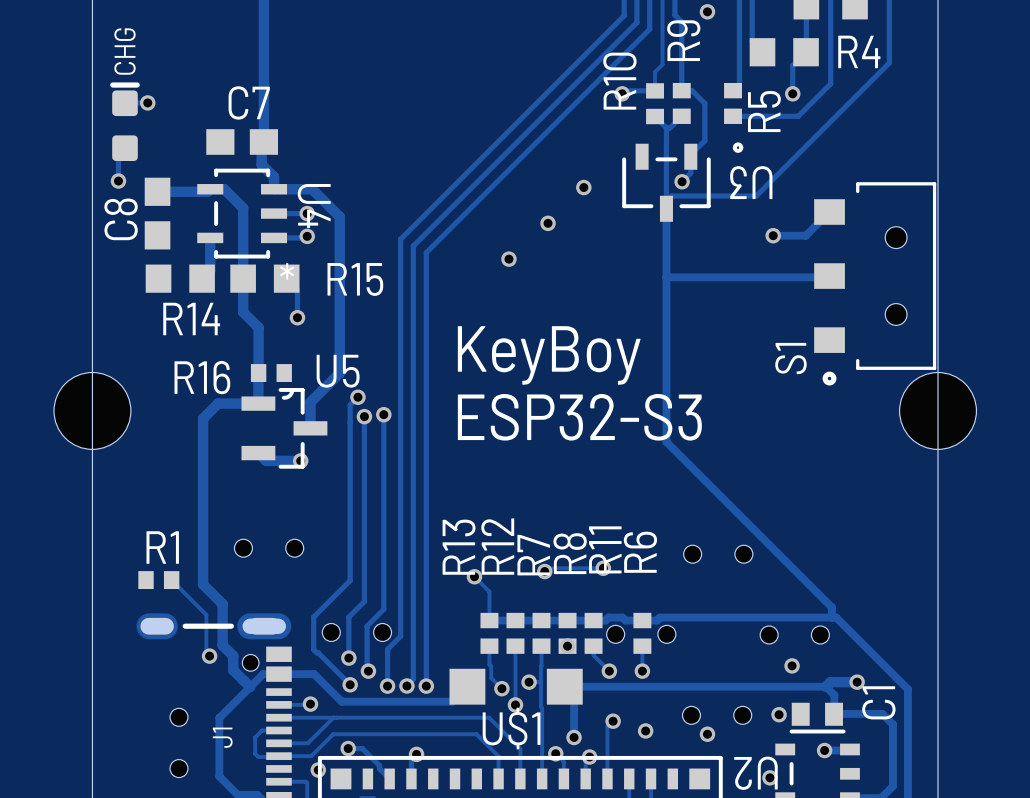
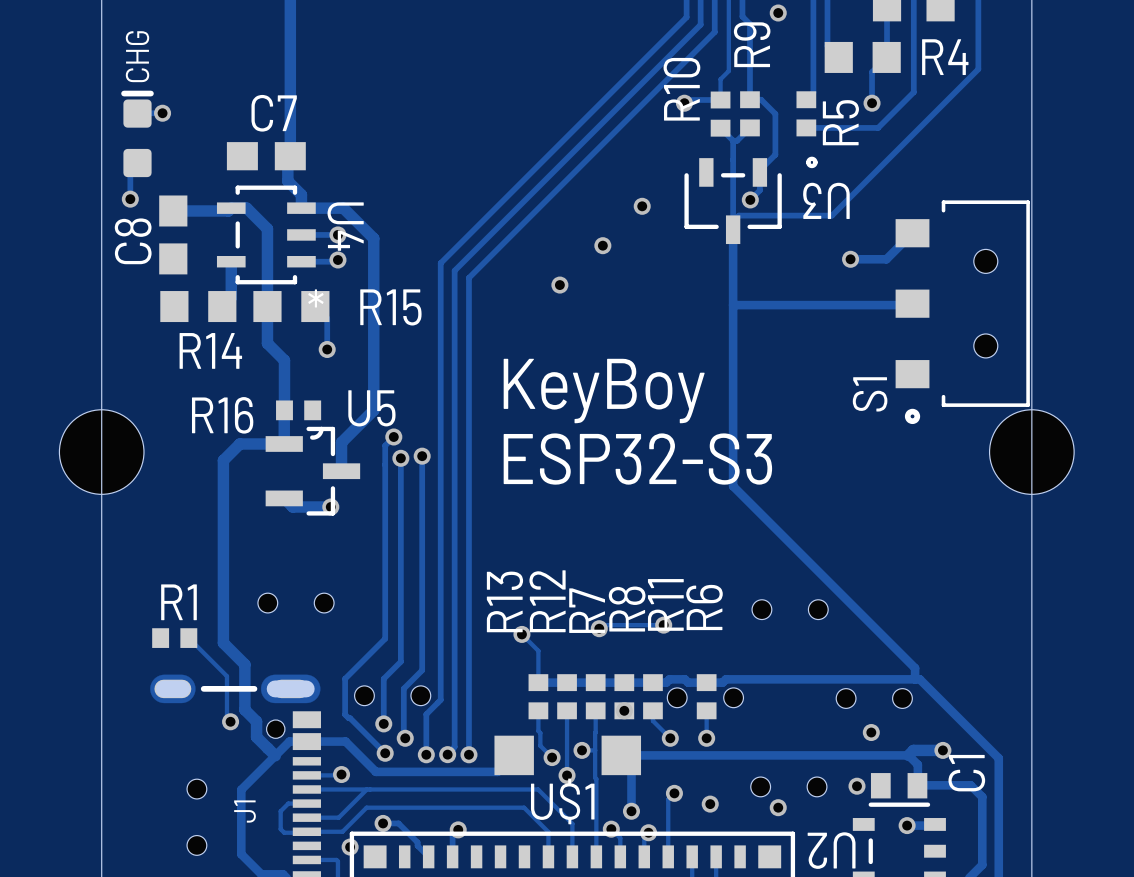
via: (769, 777) -> none

